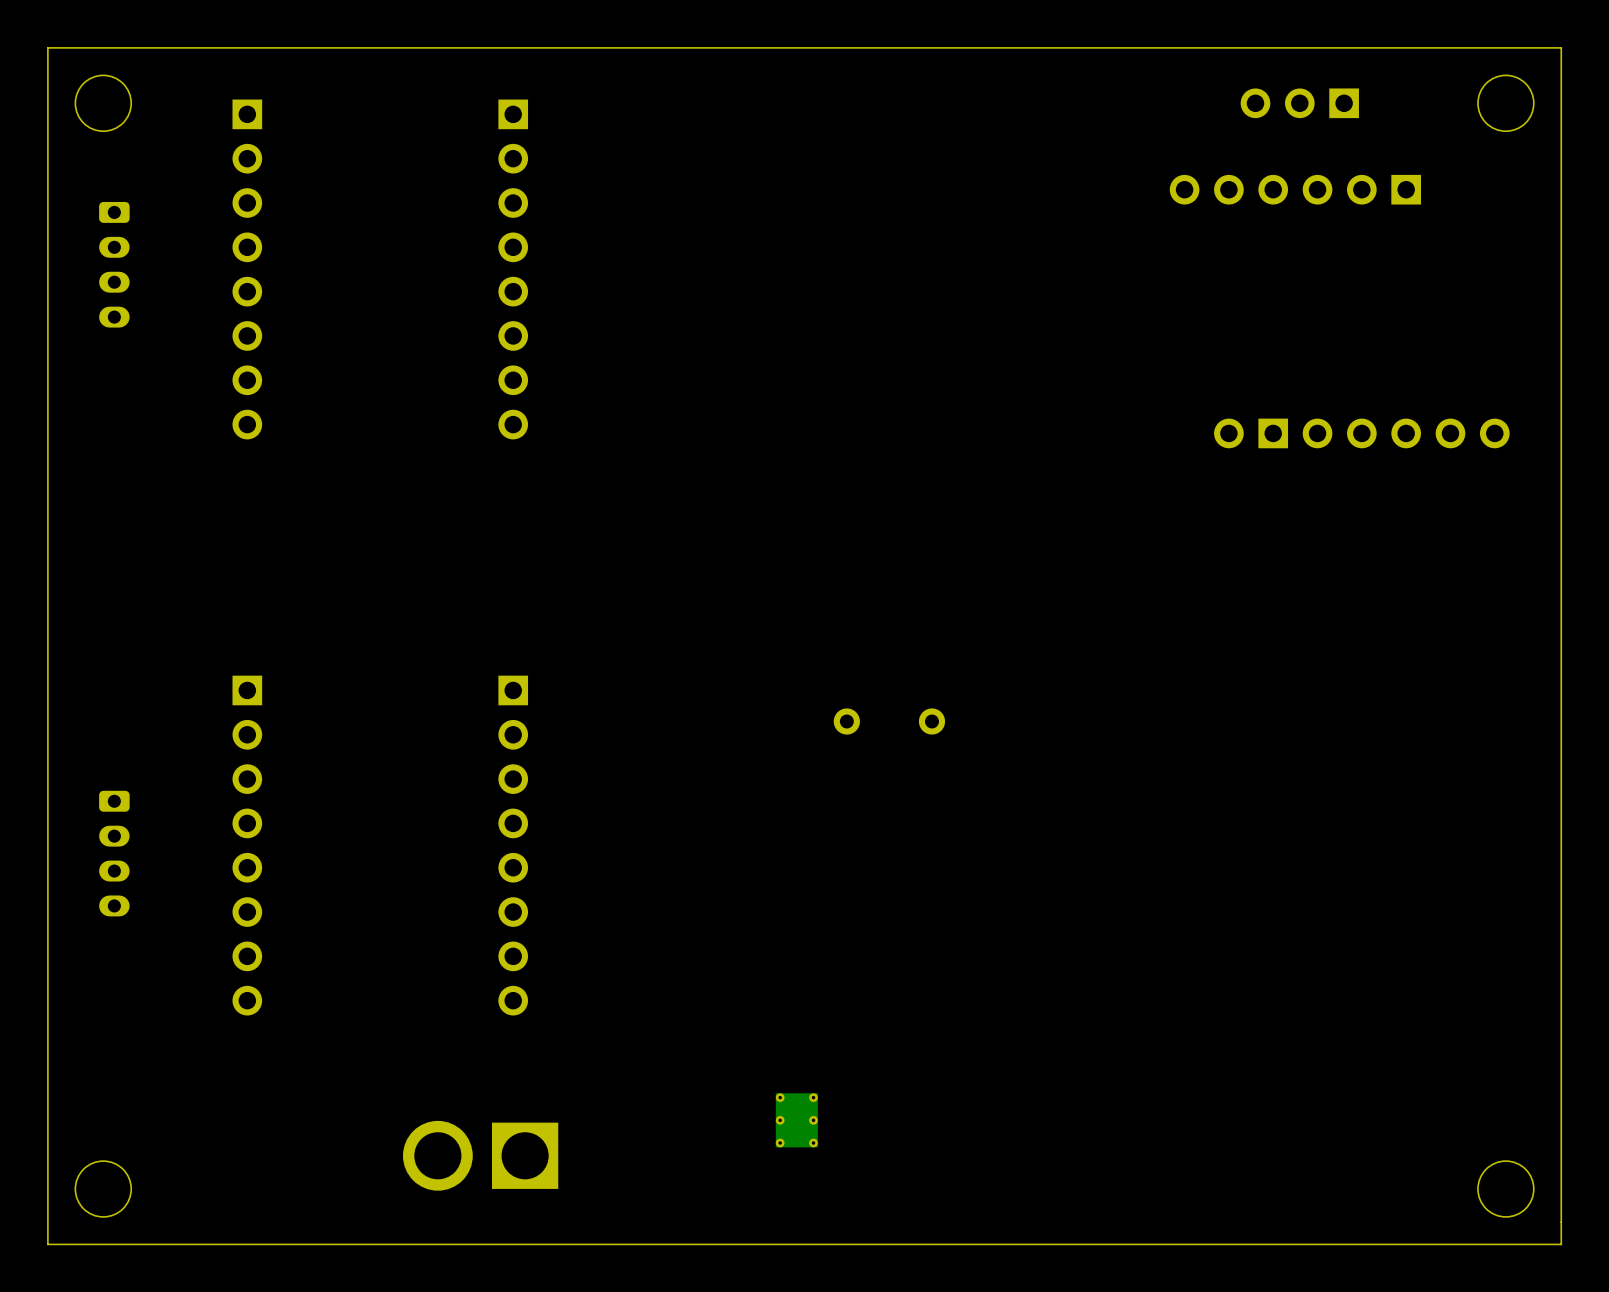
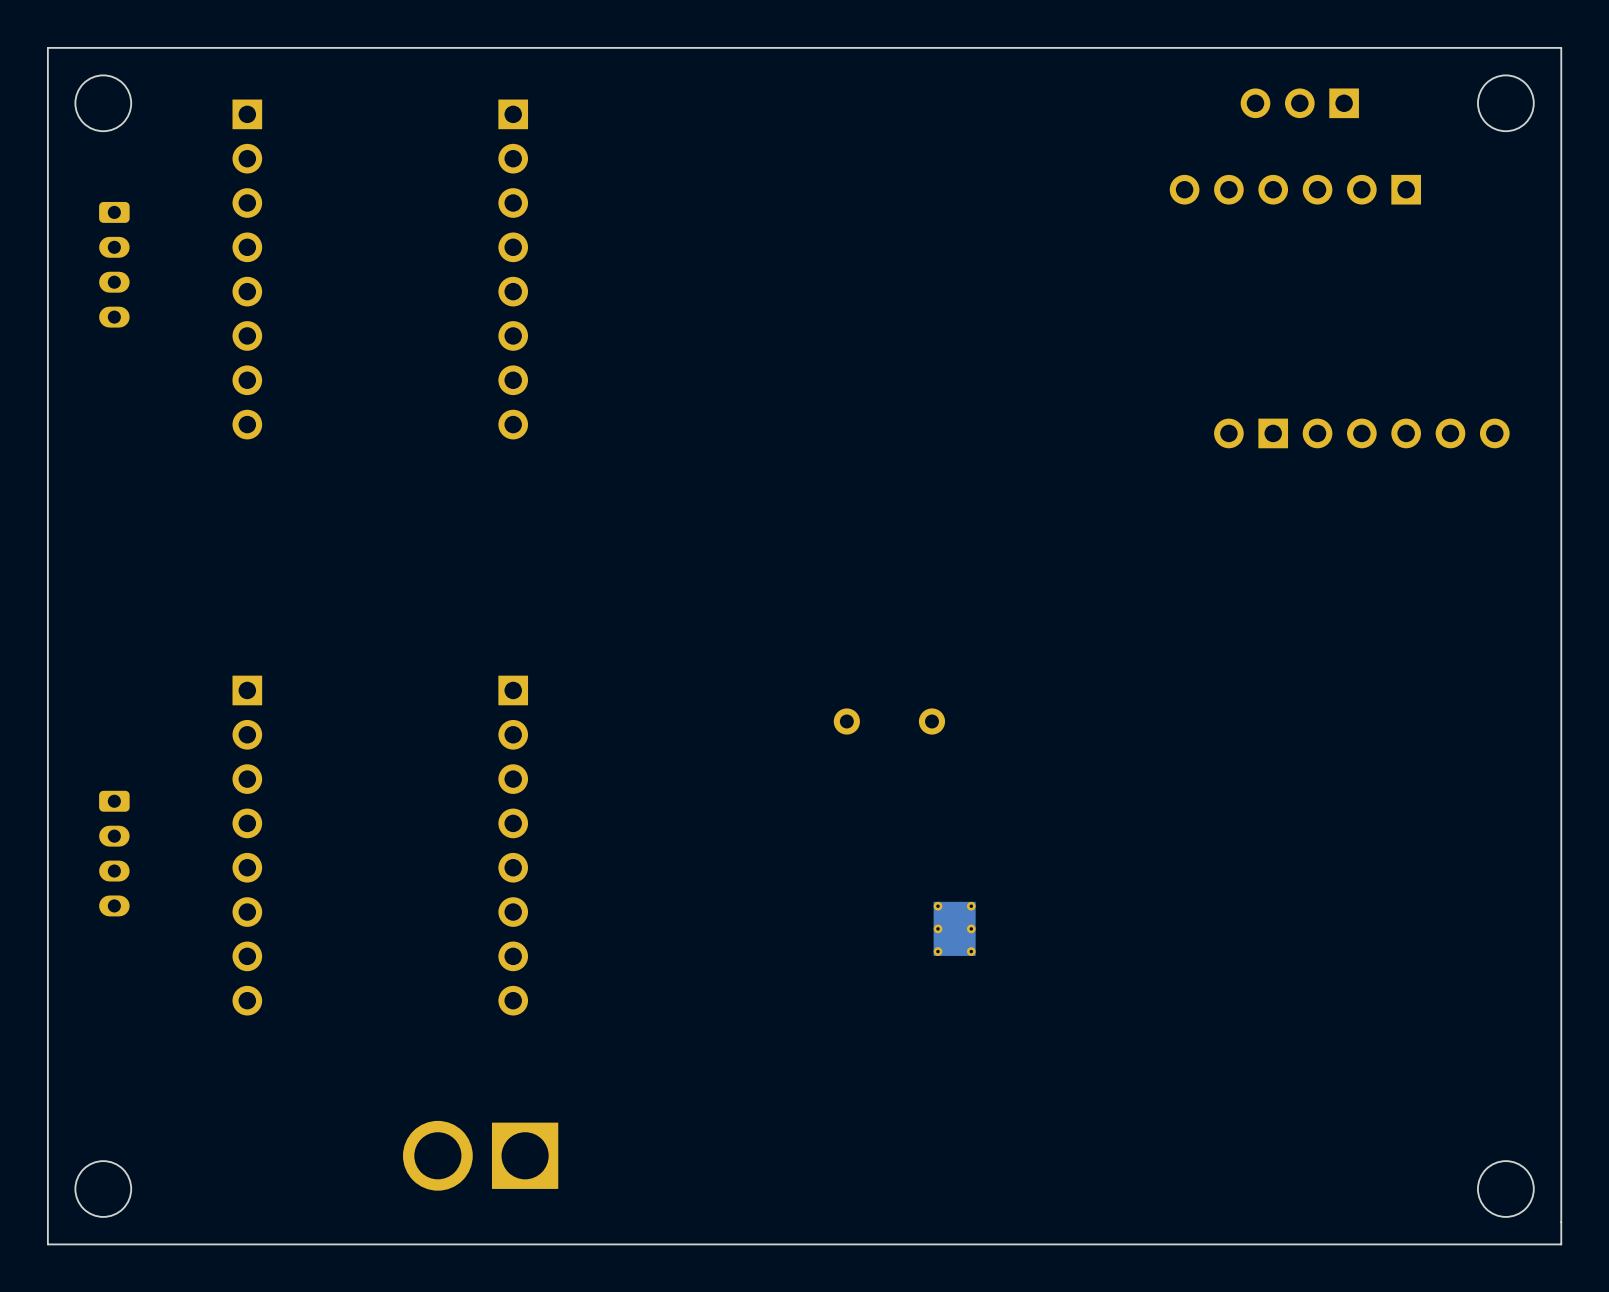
part position: (796, 1120) -> (954, 928)

